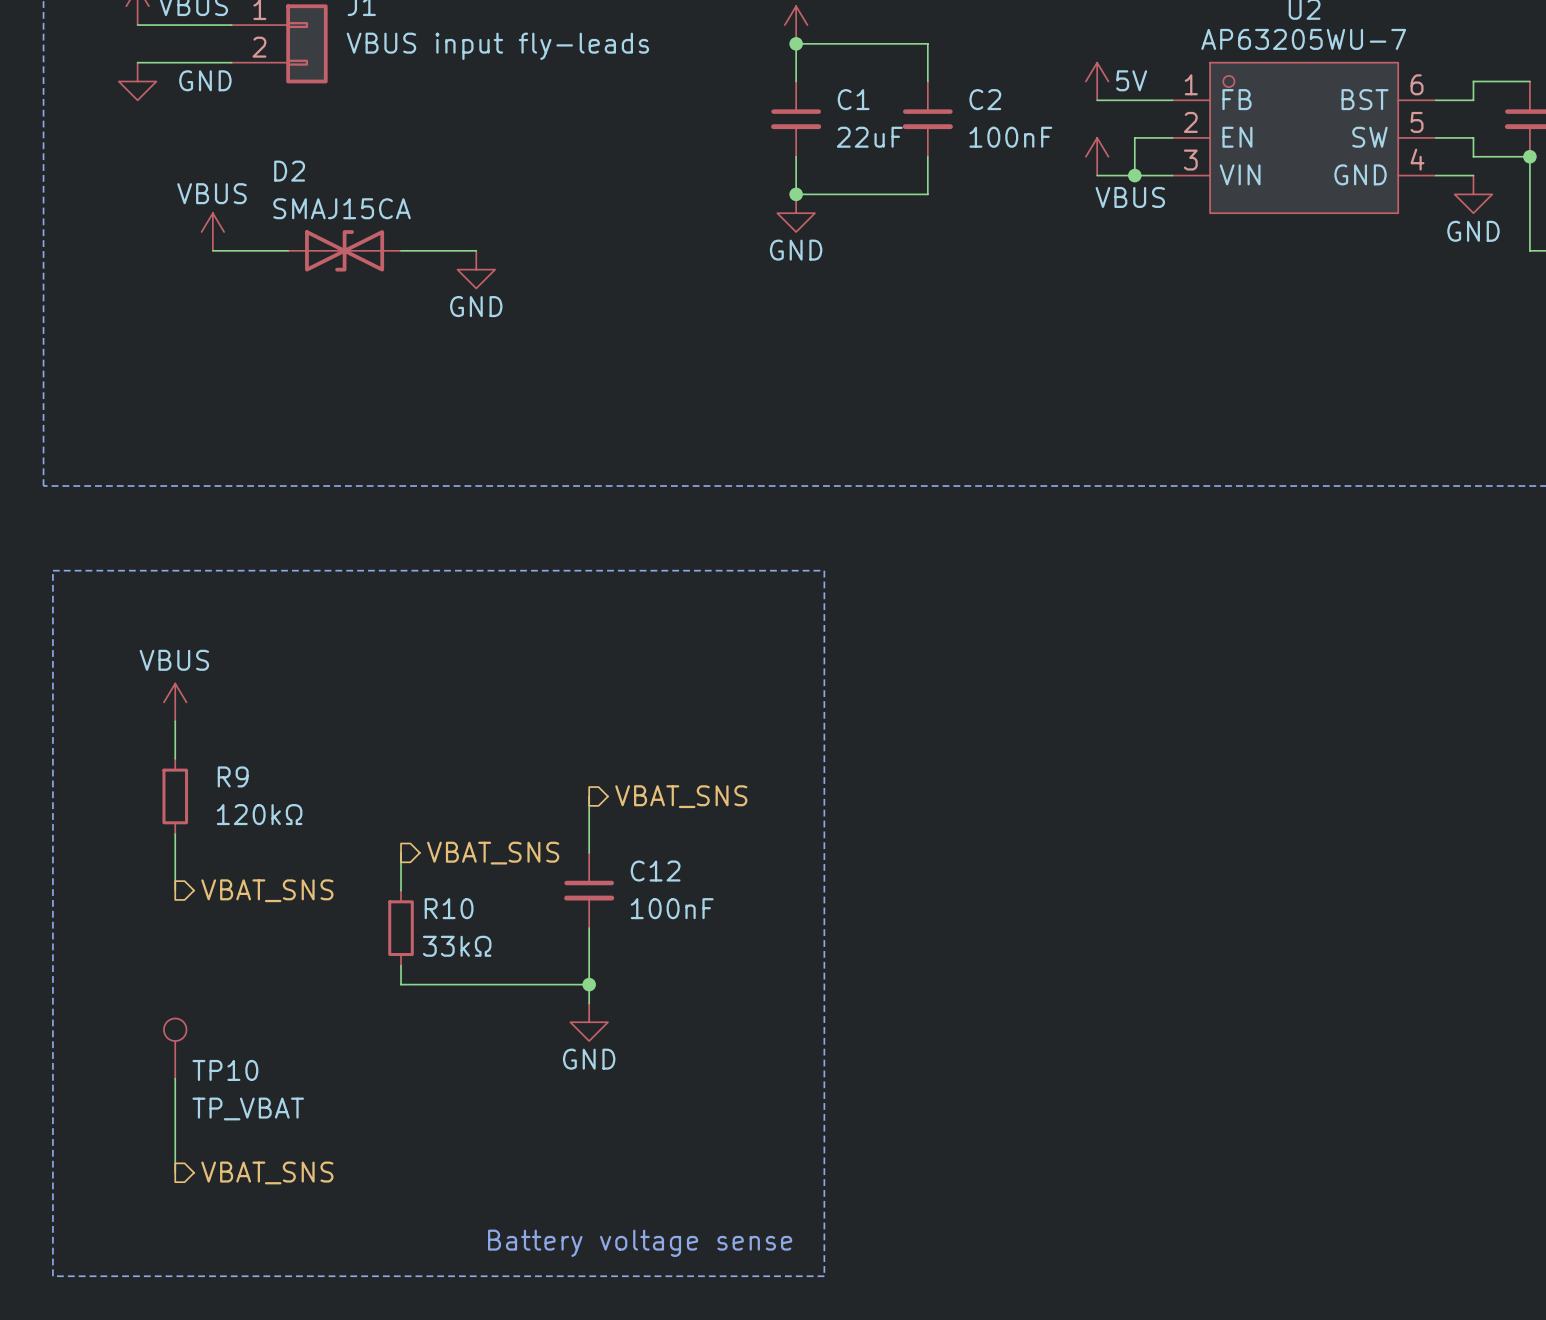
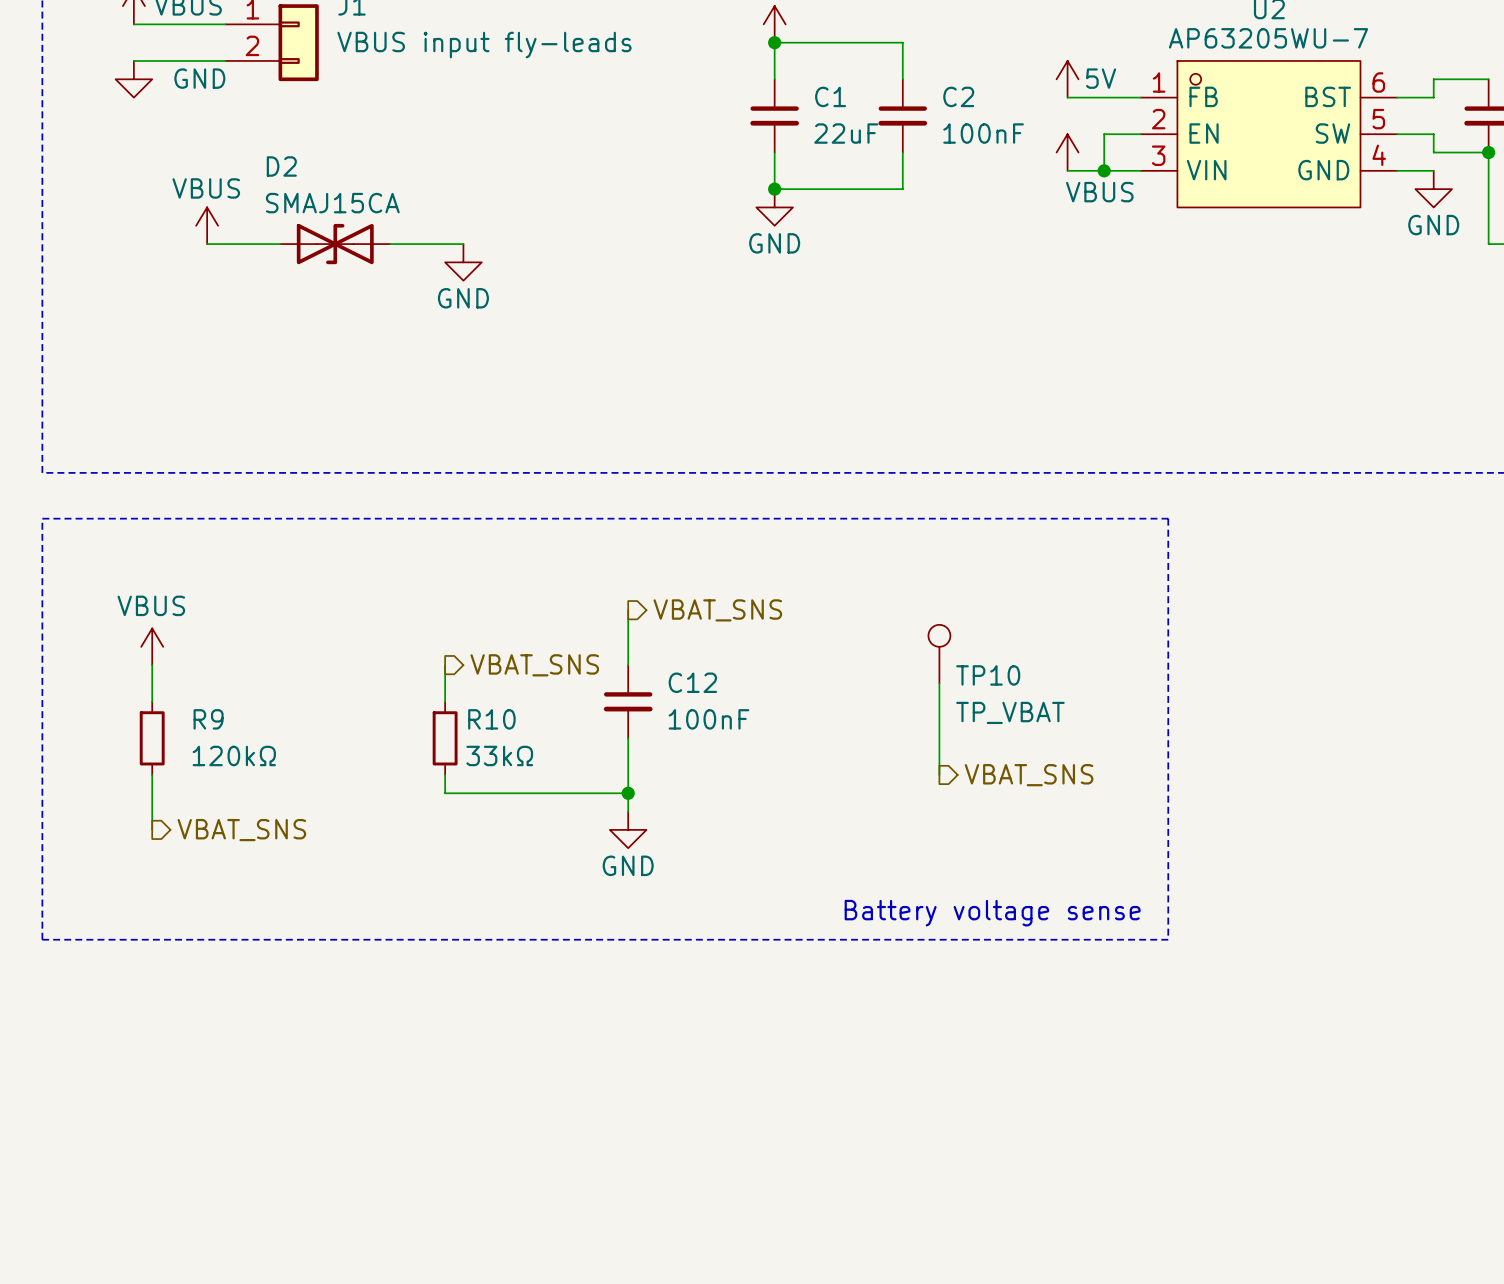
line: none -> (42, 518) (1168, 518) (1168, 939) (42, 939) (42, 518)
line: (52, 570) (824, 570) (824, 1276) (52, 1276) (52, 570) -> none
hierarchical label: none -> VBAT_SNS (717, 610)
hierarchical label: none -> VBAT_SNS (534, 665)
power symbol position: VBUS (175, 702) -> VBUS (152, 646)
wire: none -> (939, 683) (939, 774)
wire: (175, 721) (175, 758) -> (152, 665) (152, 701)
R9 position: (175, 796) -> (152, 738)
wire: (589, 796) (589, 852) -> (628, 610) (628, 665)
hierarchical label: VBAT_SNS (681, 796) -> none
hierarchical label: none -> VBAT_SNS (1029, 775)
junction: none -> (628, 793)
wire: (175, 834) (175, 890) -> (152, 774) (152, 829)
wire: (401, 852) (401, 890) -> (445, 665) (445, 701)
hierarchical label: VBAT_SNS (493, 853) -> none
hierarchical label position: VBAT_SNS (267, 890) -> VBAT_SNS (241, 830)
C12 position: (589, 890) -> (628, 701)
R10 position: (401, 928) -> (445, 738)
wire: (589, 928) (589, 1003) -> (628, 738) (628, 811)
text: none -> Battery voltage sense (992, 913)
wire: (401, 965) (401, 984) (589, 984) -> (445, 774) (445, 793) (628, 793)
junction: (589, 984) -> none
power symbol position: GND (589, 1022) -> GND (628, 829)
TP10 position: (175, 1048) -> (939, 654)
wire: (175, 1078) (175, 1172) -> none
hierarchical label: VBAT_SNS (267, 1172) -> none
text: Battery voltage sense (640, 1243) -> none

